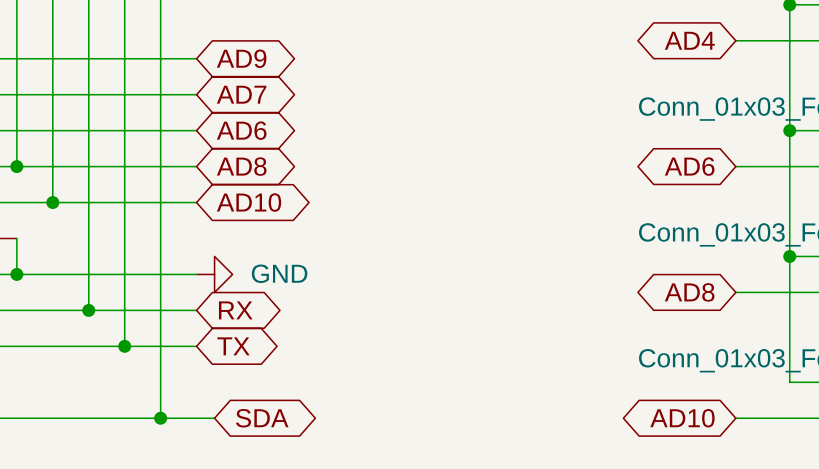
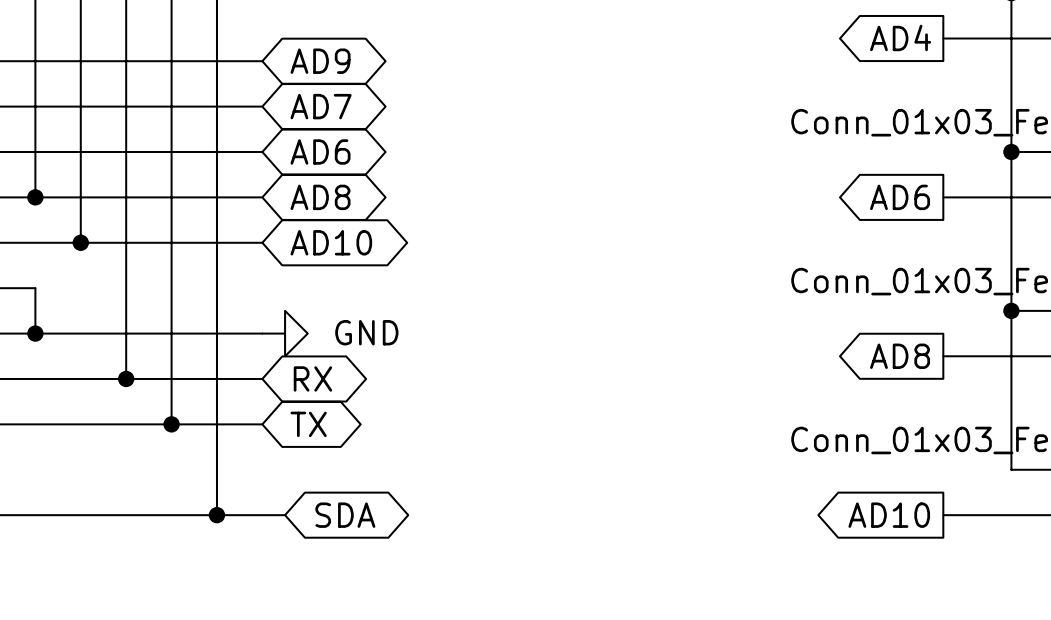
global label shape: bidirectional (689, 40) -> output (900, 37)
global label shape: bidirectional (689, 166) -> output (900, 197)
global label shape: bidirectional (689, 292) -> output (900, 356)
global label shape: bidirectional (682, 418) -> output (889, 515)

